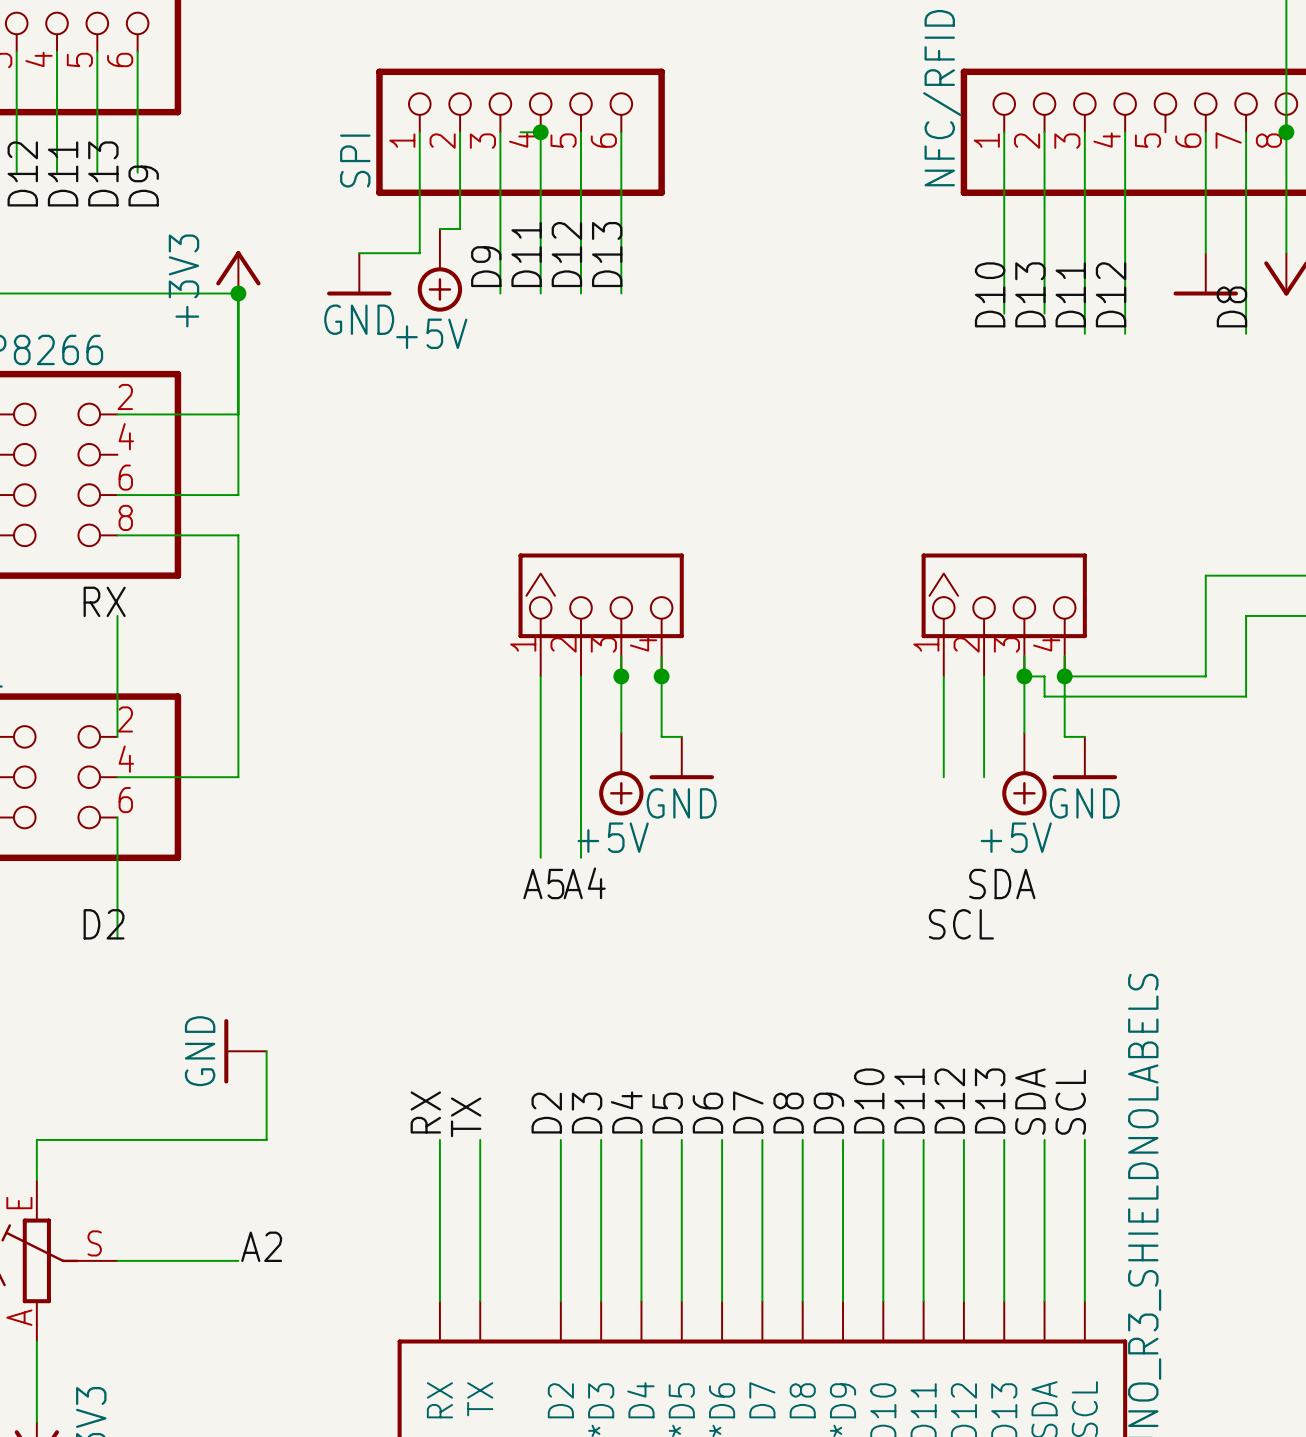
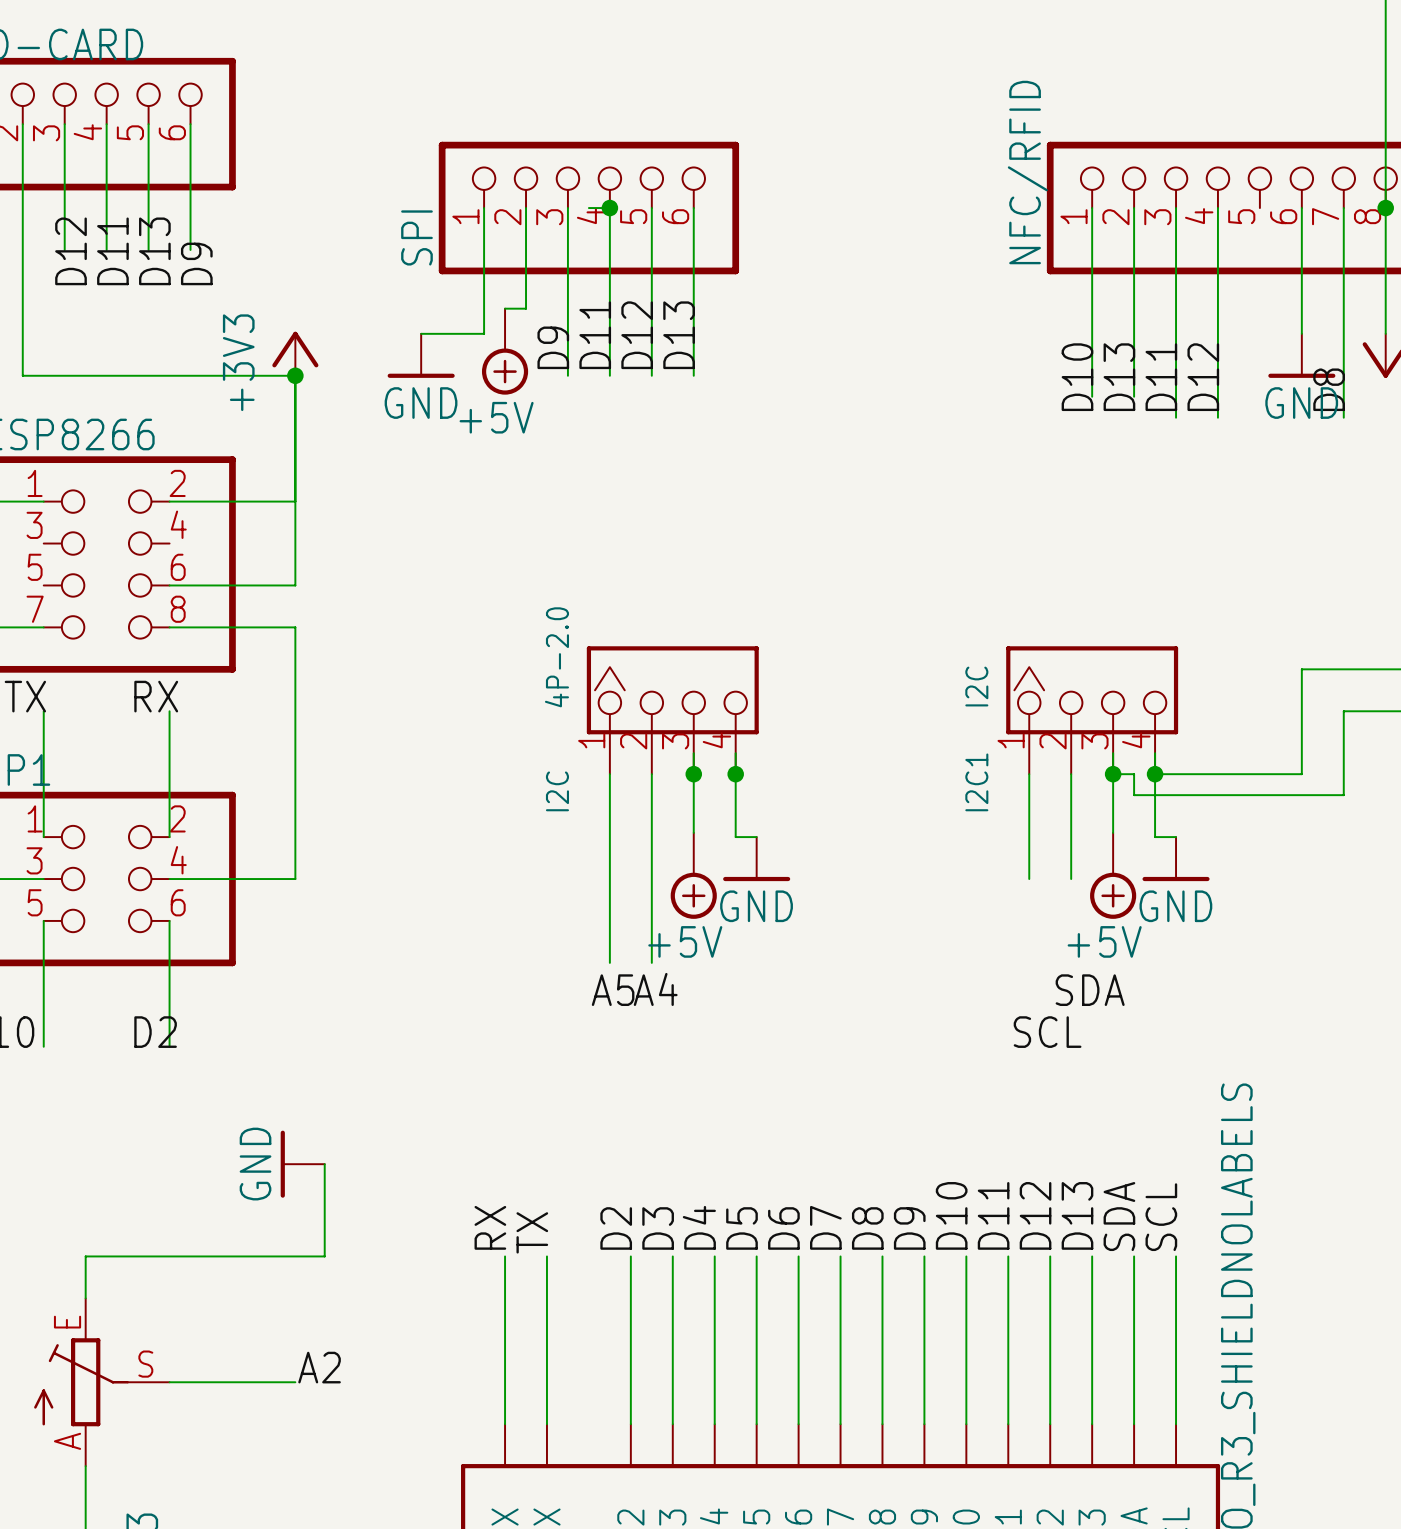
power symbol text: none -> GND (1301, 403)
I2C value: none -> 4P-2.0 (556, 657)
I2C1 value: none -> I2C (976, 686)
I2C1 name: none -> I2C1 (976, 782)
I2C name: none -> I2C (557, 791)

